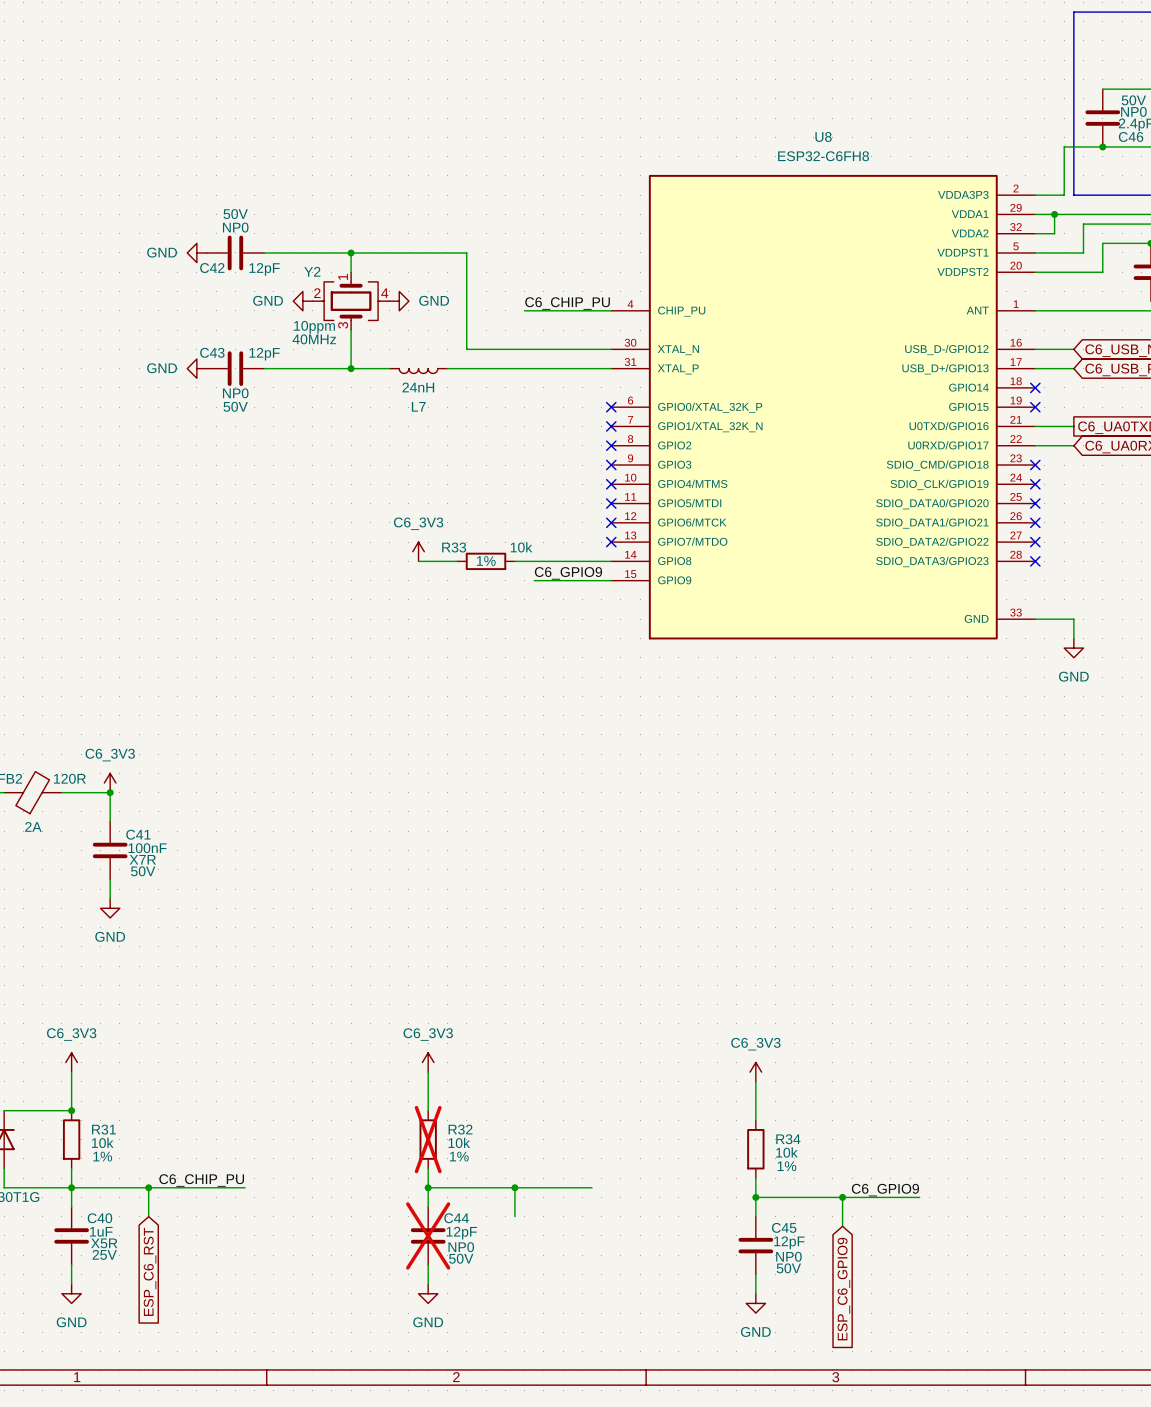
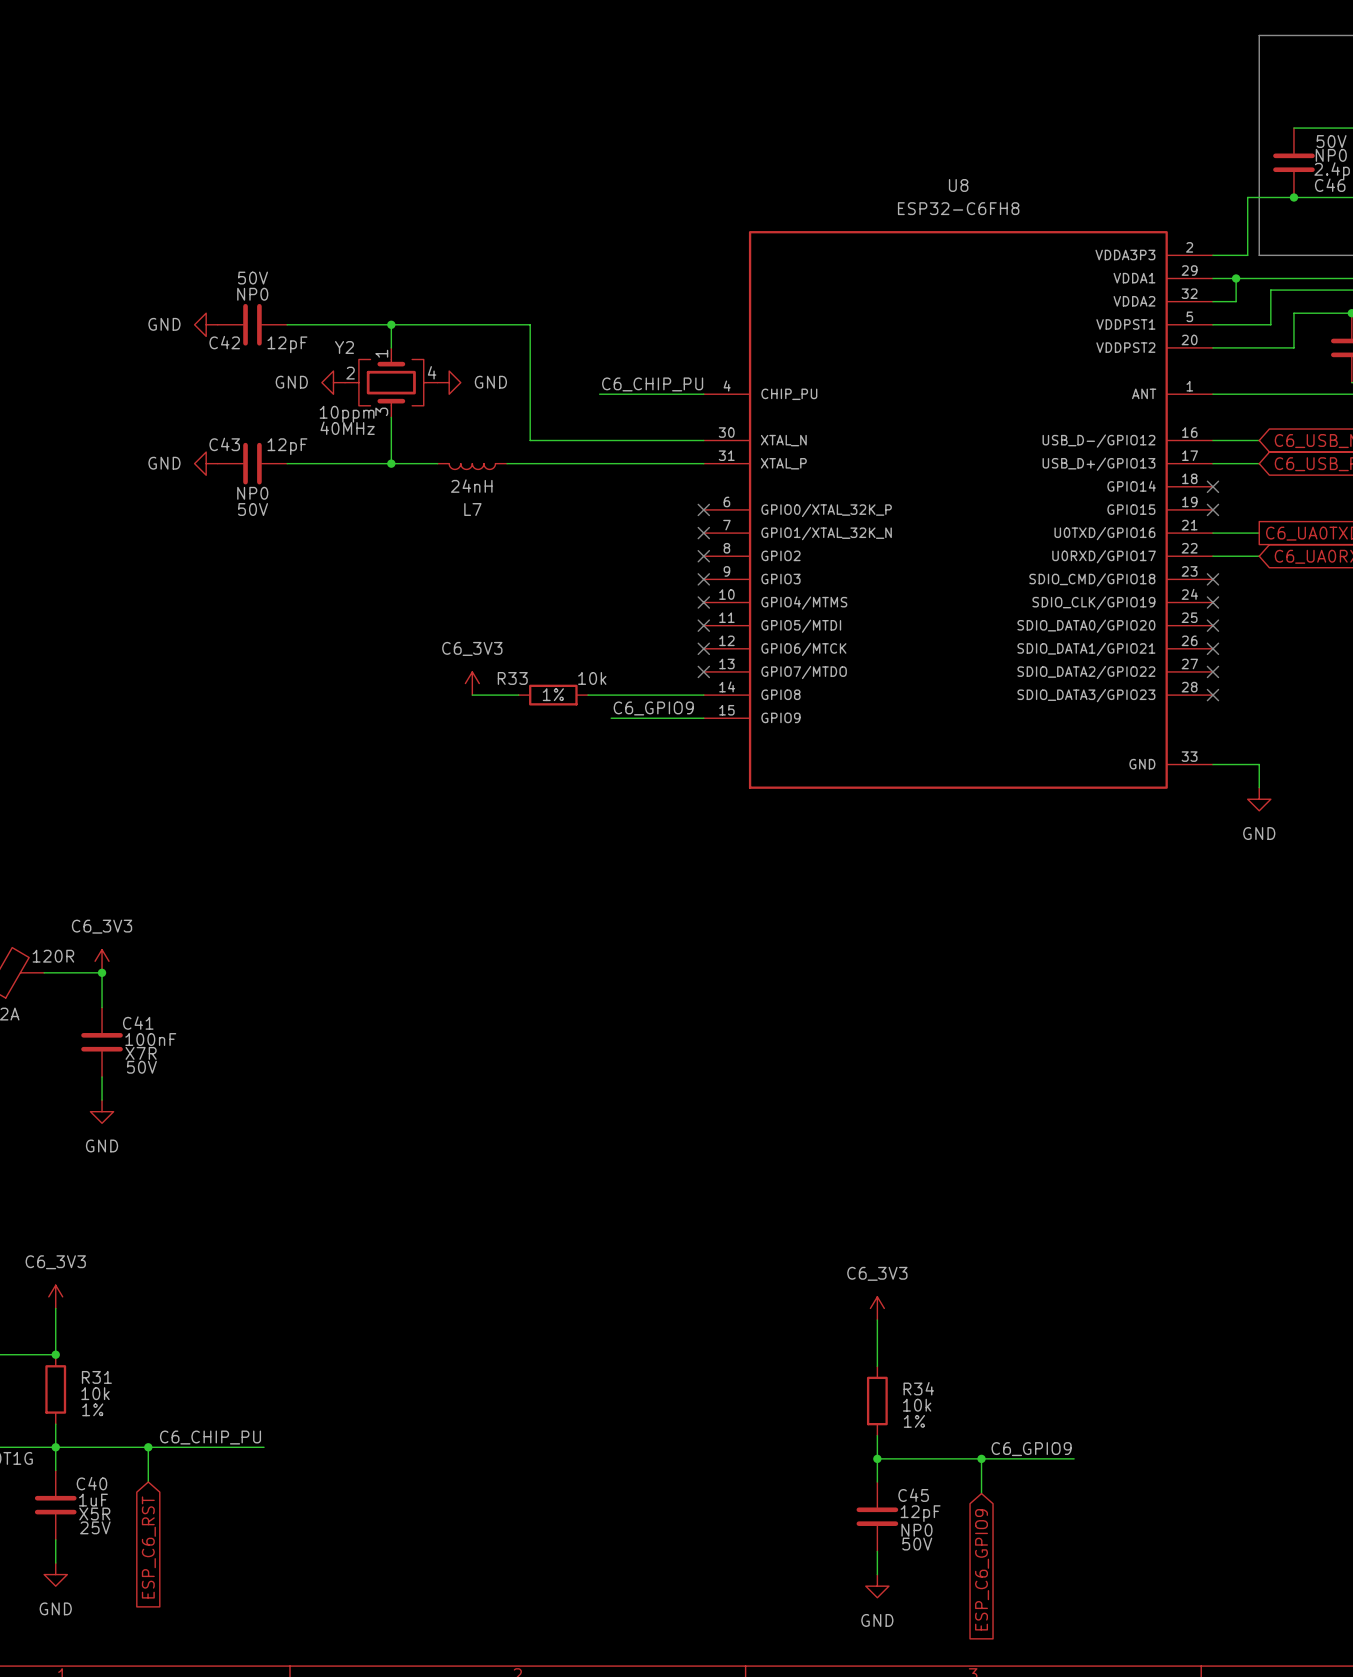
power symbol: C6_3V3 (428, 1062) -> none
wire: (428, 1072) (428, 1110) -> none
R32: 10k (428, 1139) -> none
wire: (428, 1168) (428, 1207) -> none
wire: (428, 1187) (592, 1187) -> none
junction: (428, 1187) -> none
wire: (514, 1187) (514, 1216) -> none
junction: (514, 1187) -> none
C44: 12pF (428, 1235) -> none
wire: (428, 1264) (428, 1284) -> none
power symbol: GND (428, 1293) -> none

